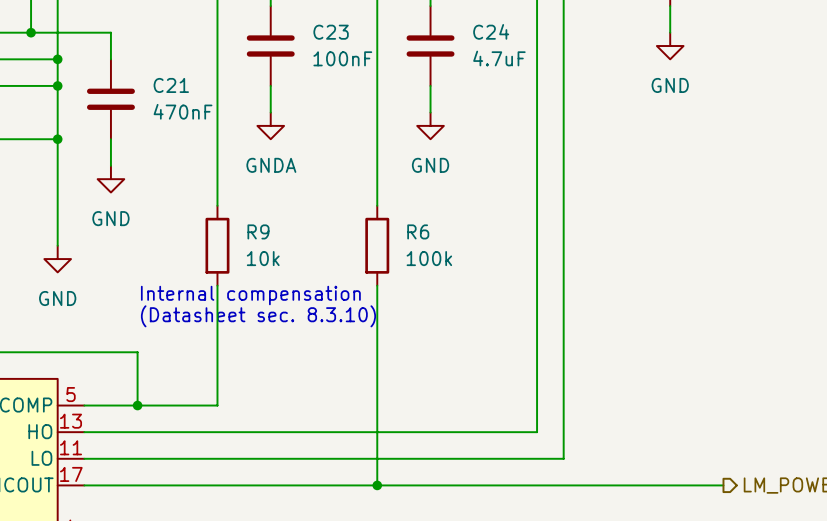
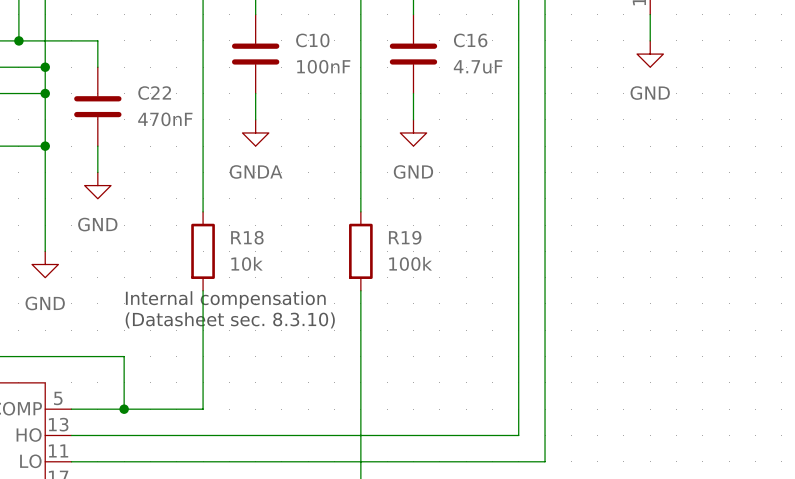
C24 name: C24 (491, 31) -> C16 (470, 40)
C23 name: C23 (331, 32) -> C10 (312, 40)
C21 name: C21 (171, 85) -> C22 (154, 93)
R9 name: R9 (258, 231) -> R18 (247, 237)
R6 name: R6 (418, 231) -> R19 (405, 237)

